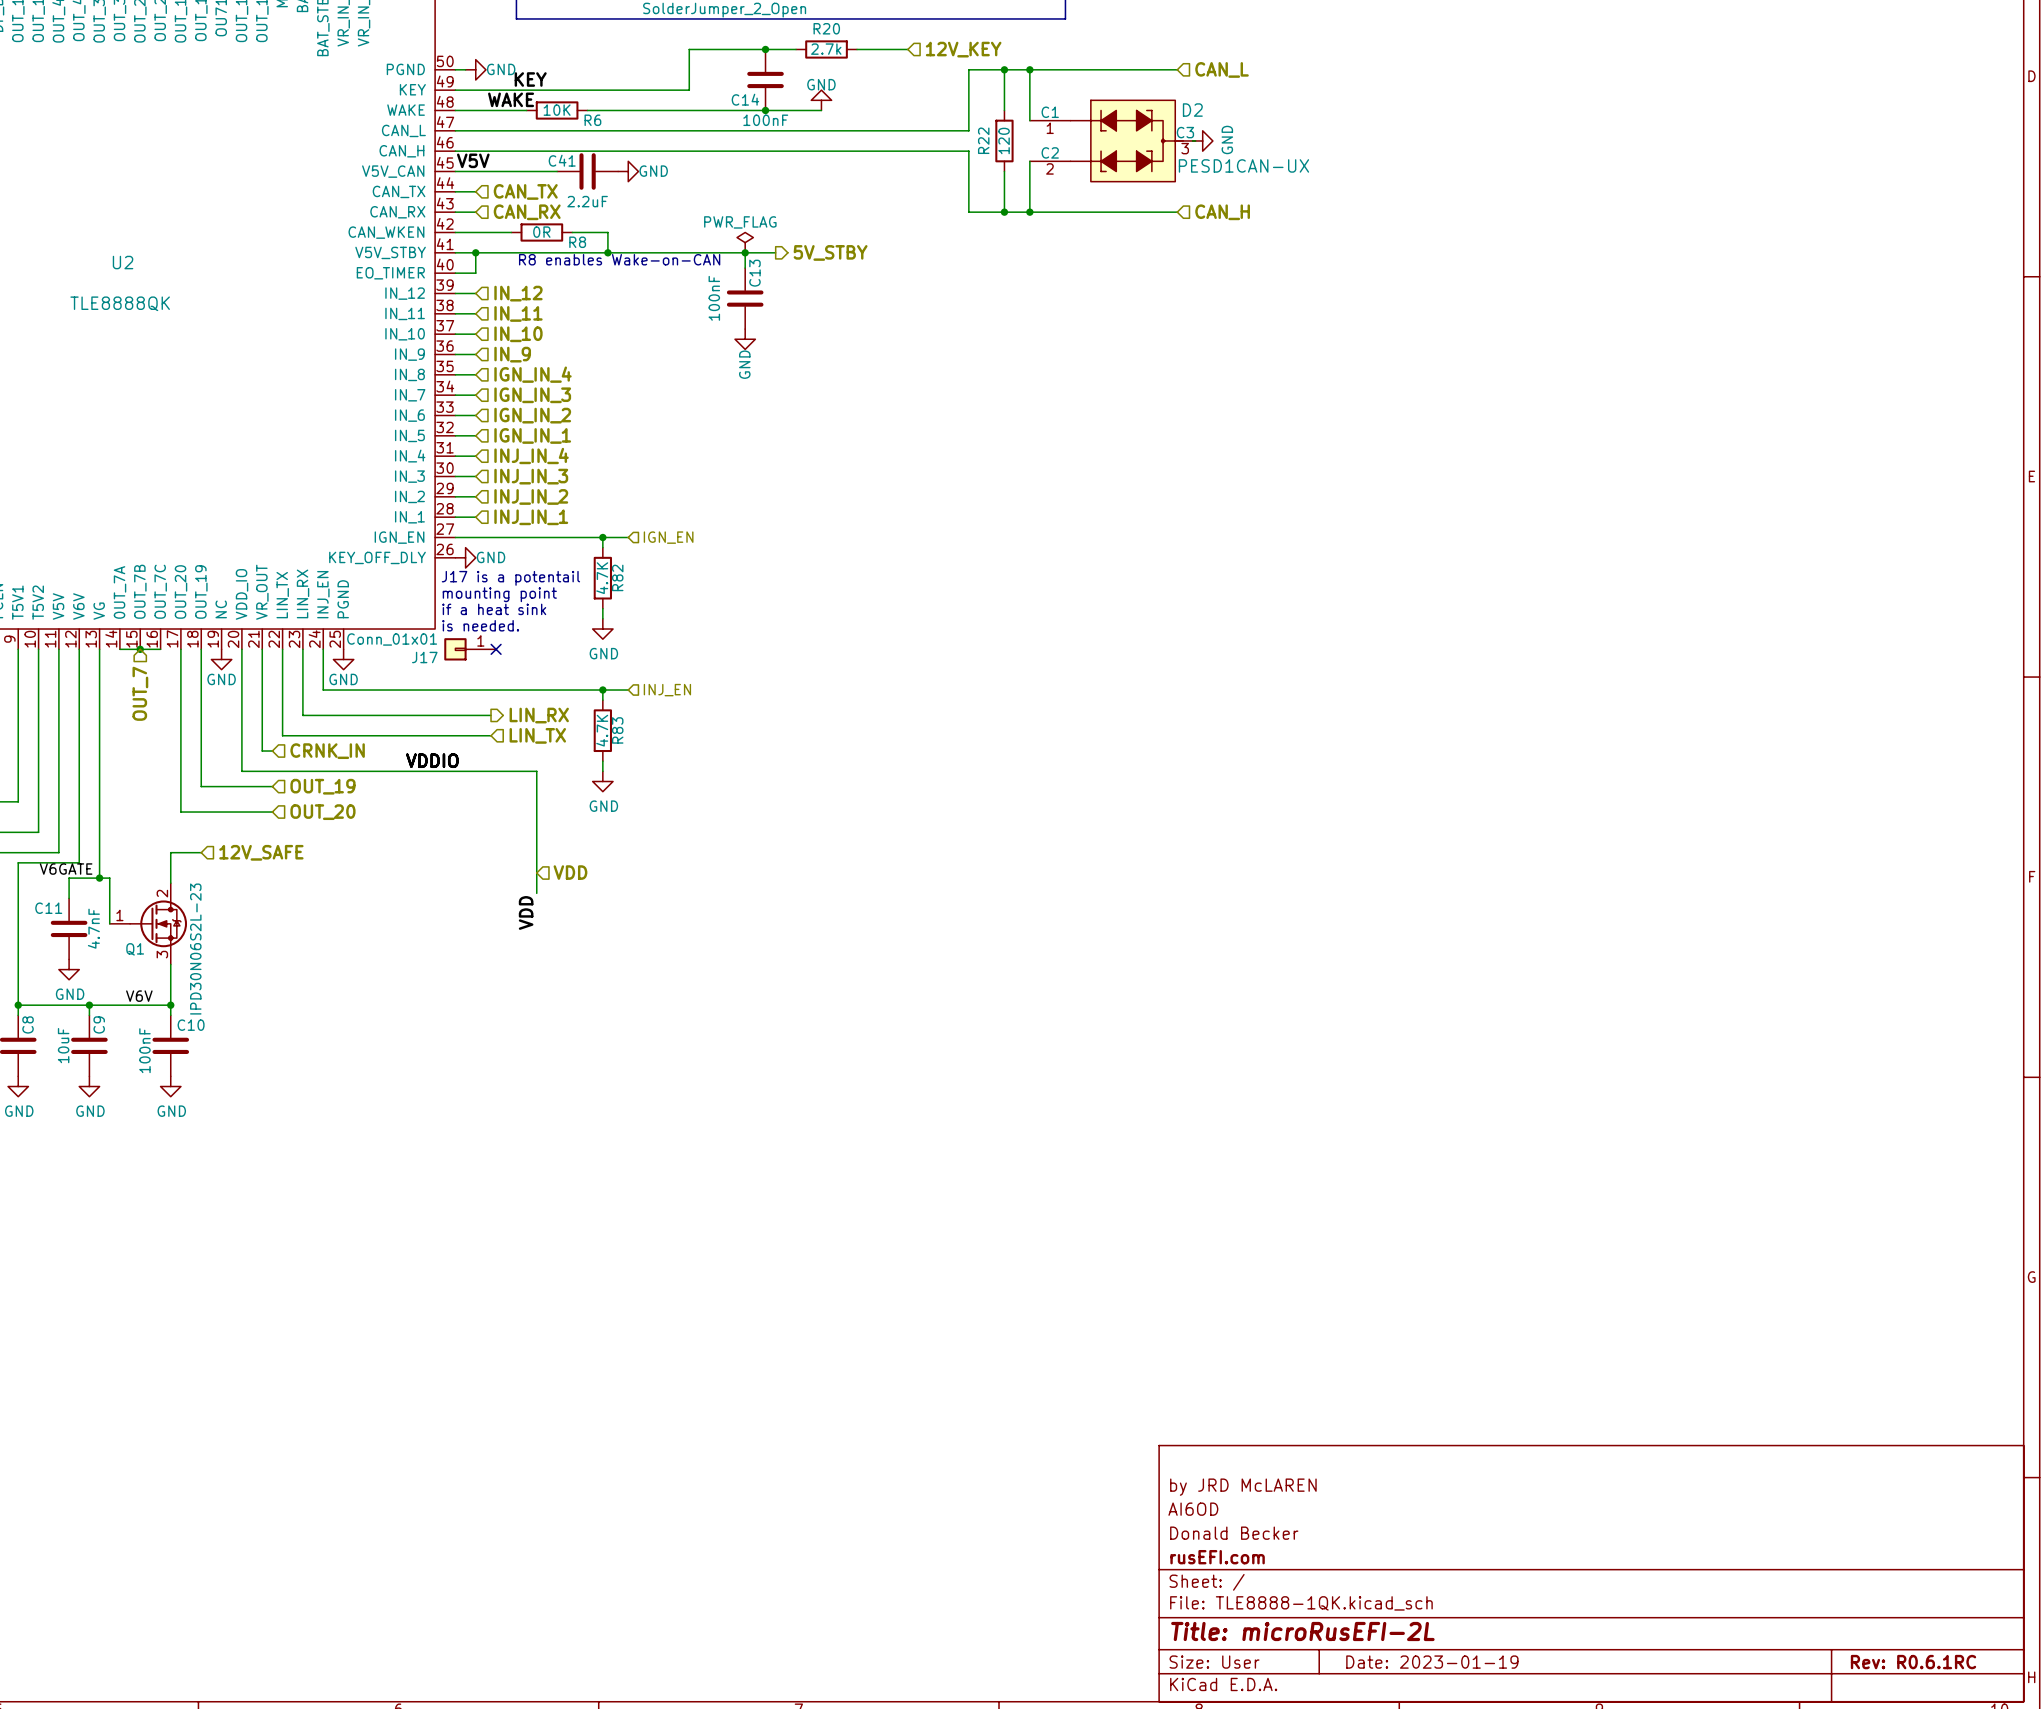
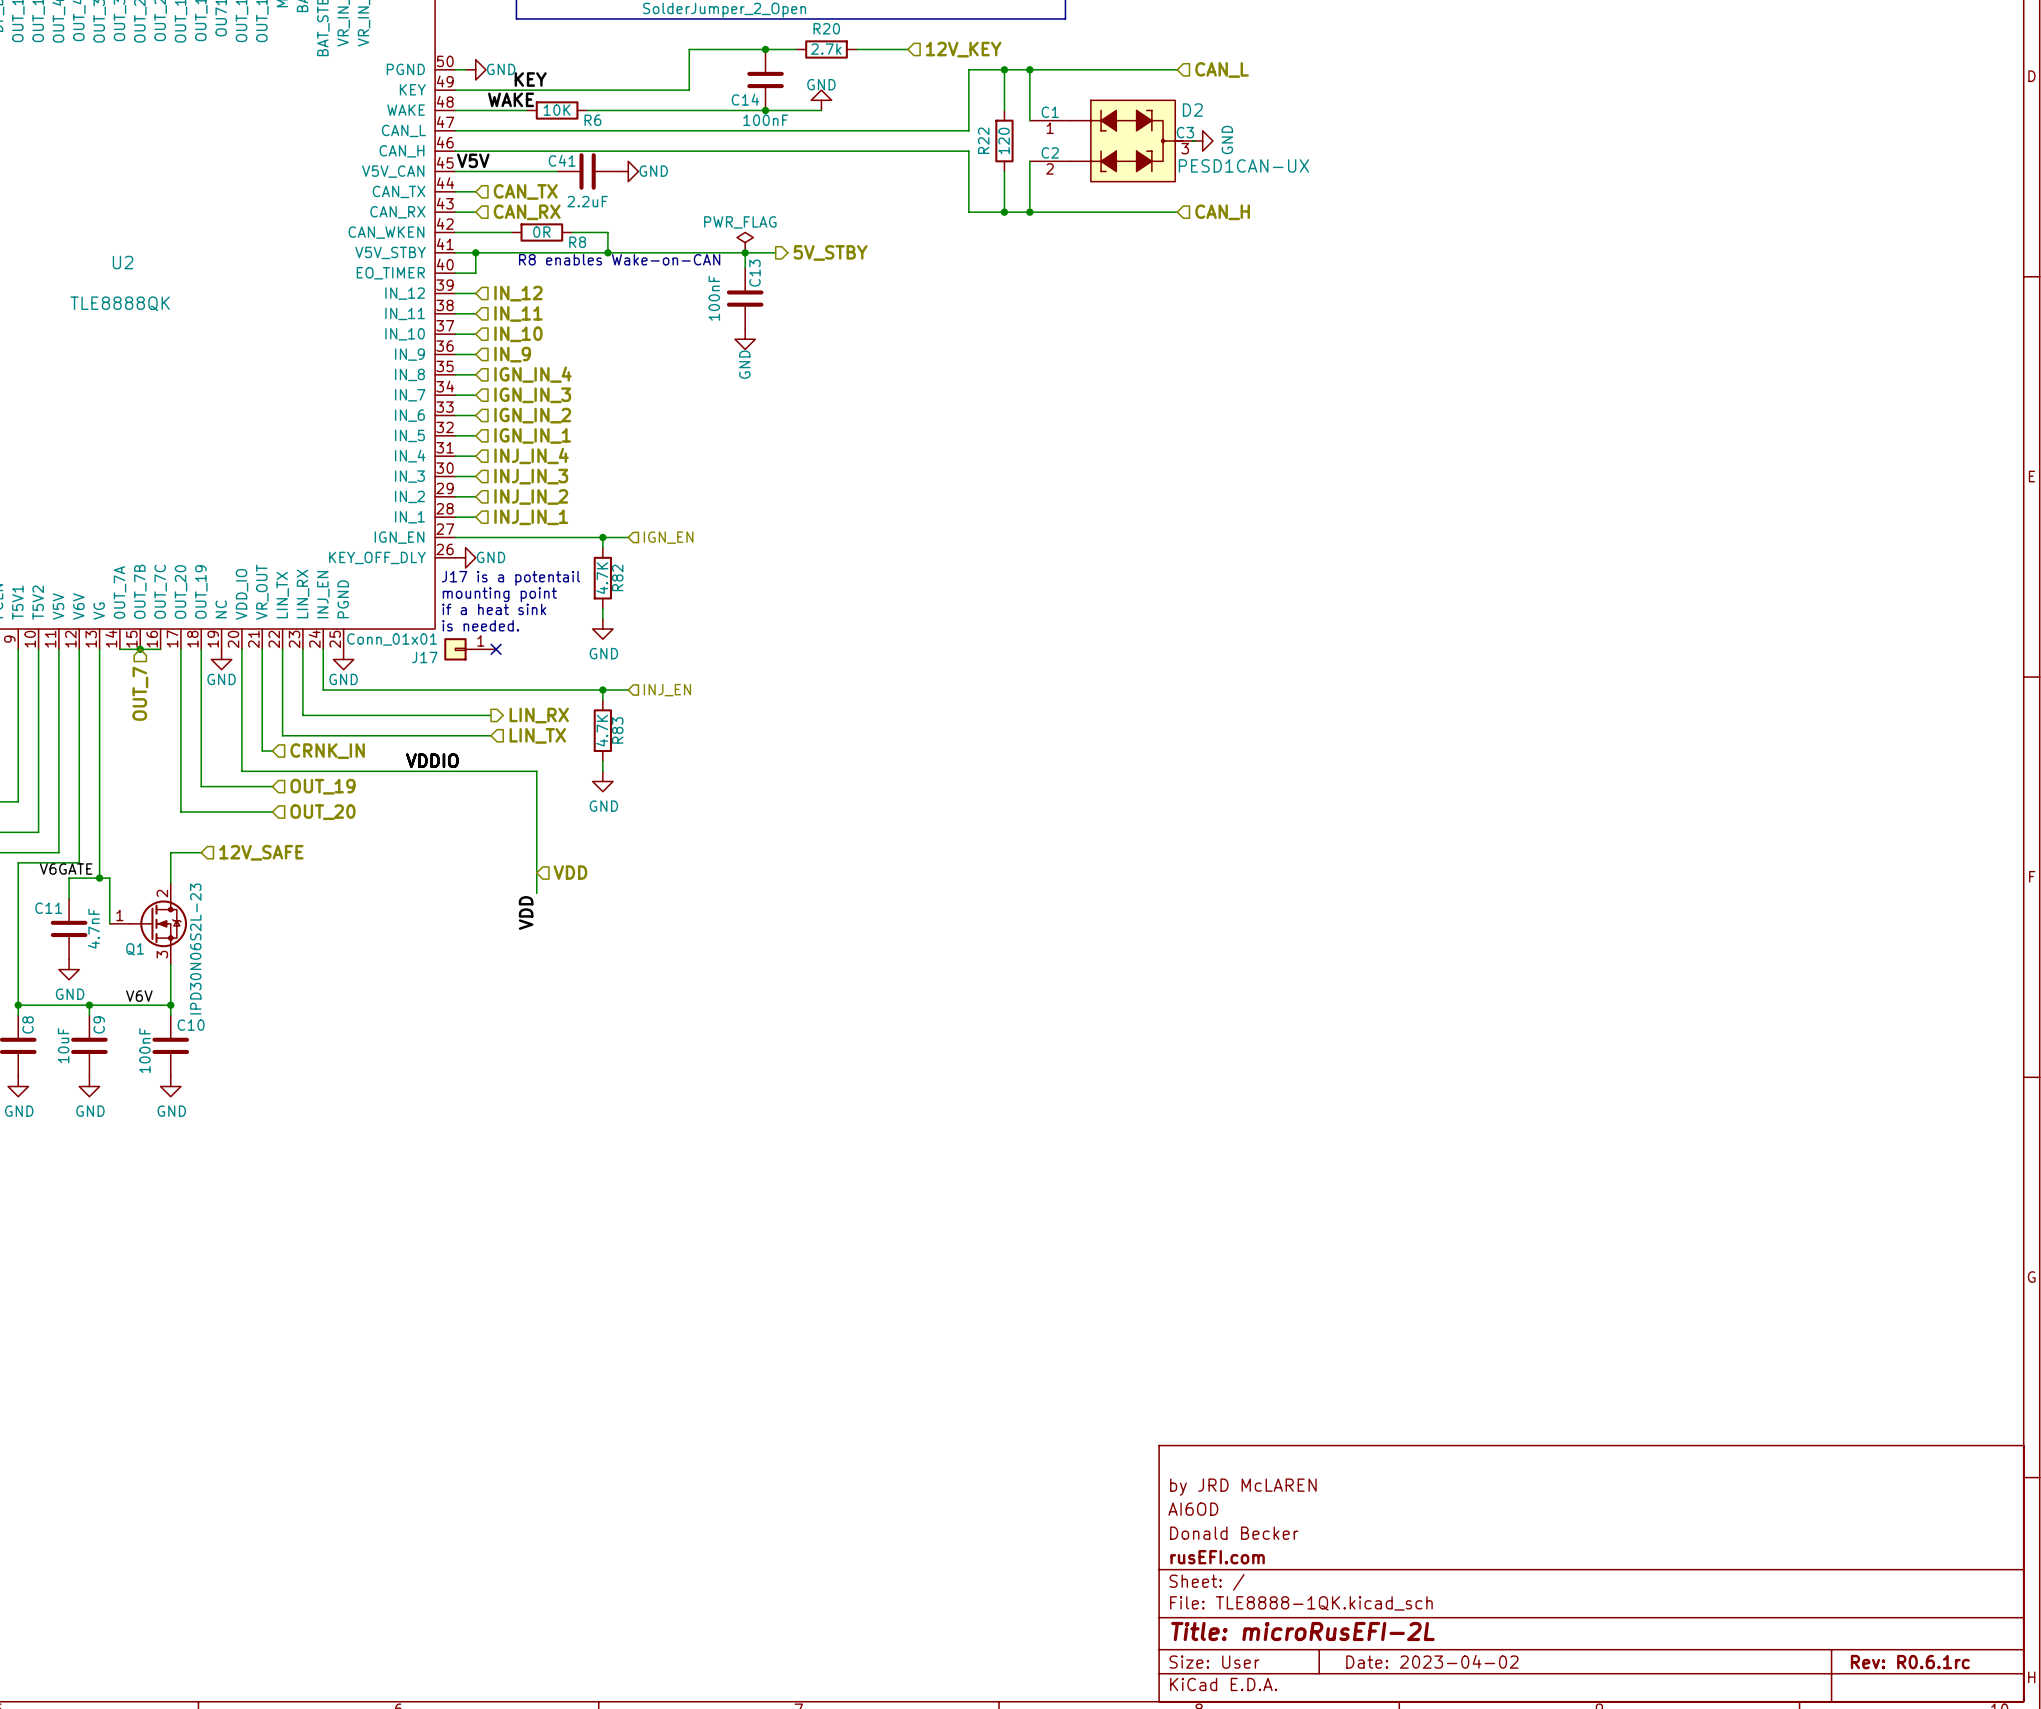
title block: Date: 2023-01-19 (1432, 1662) -> Date: 2023-04-02 (1432, 1661)
title block: Rev: R0.6.1RC (1913, 1662) -> Rev: R0.6.1rc (1910, 1662)

